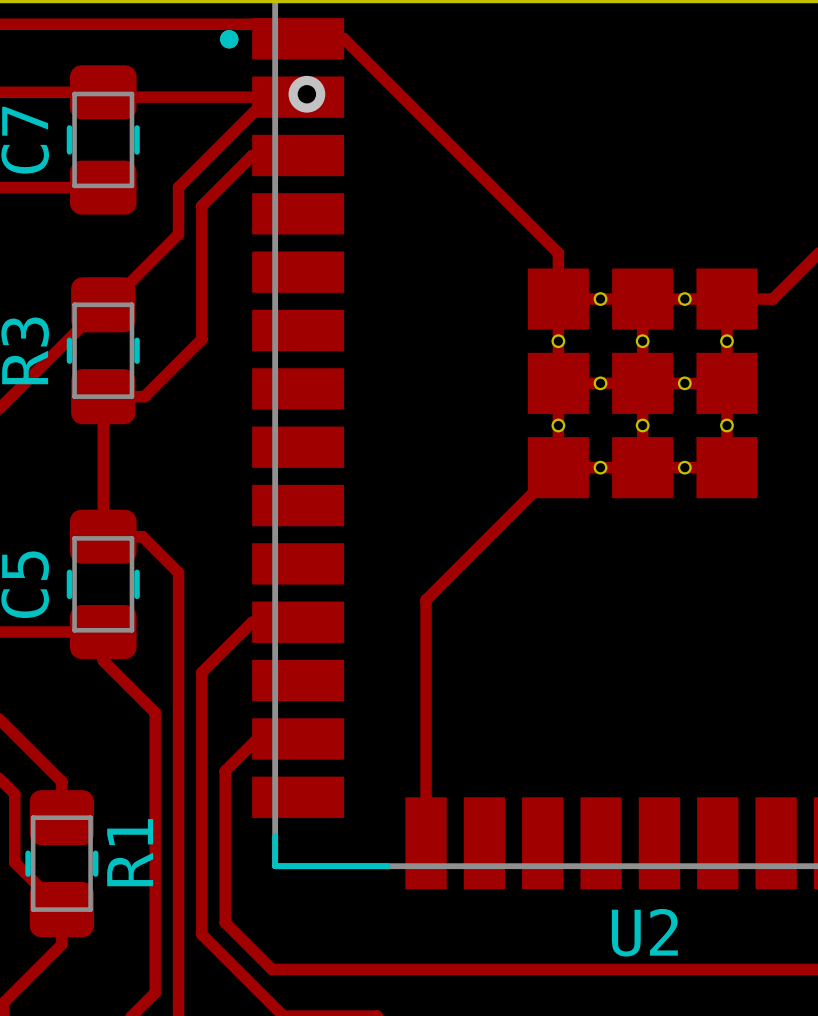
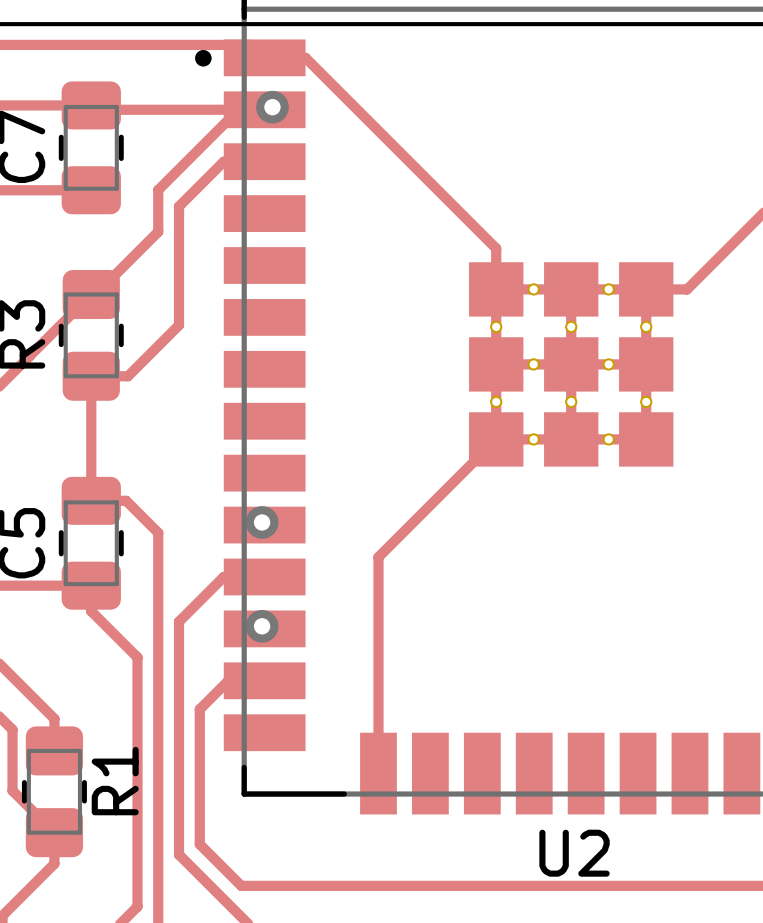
via: none -> (262, 522)
via: none -> (262, 626)

